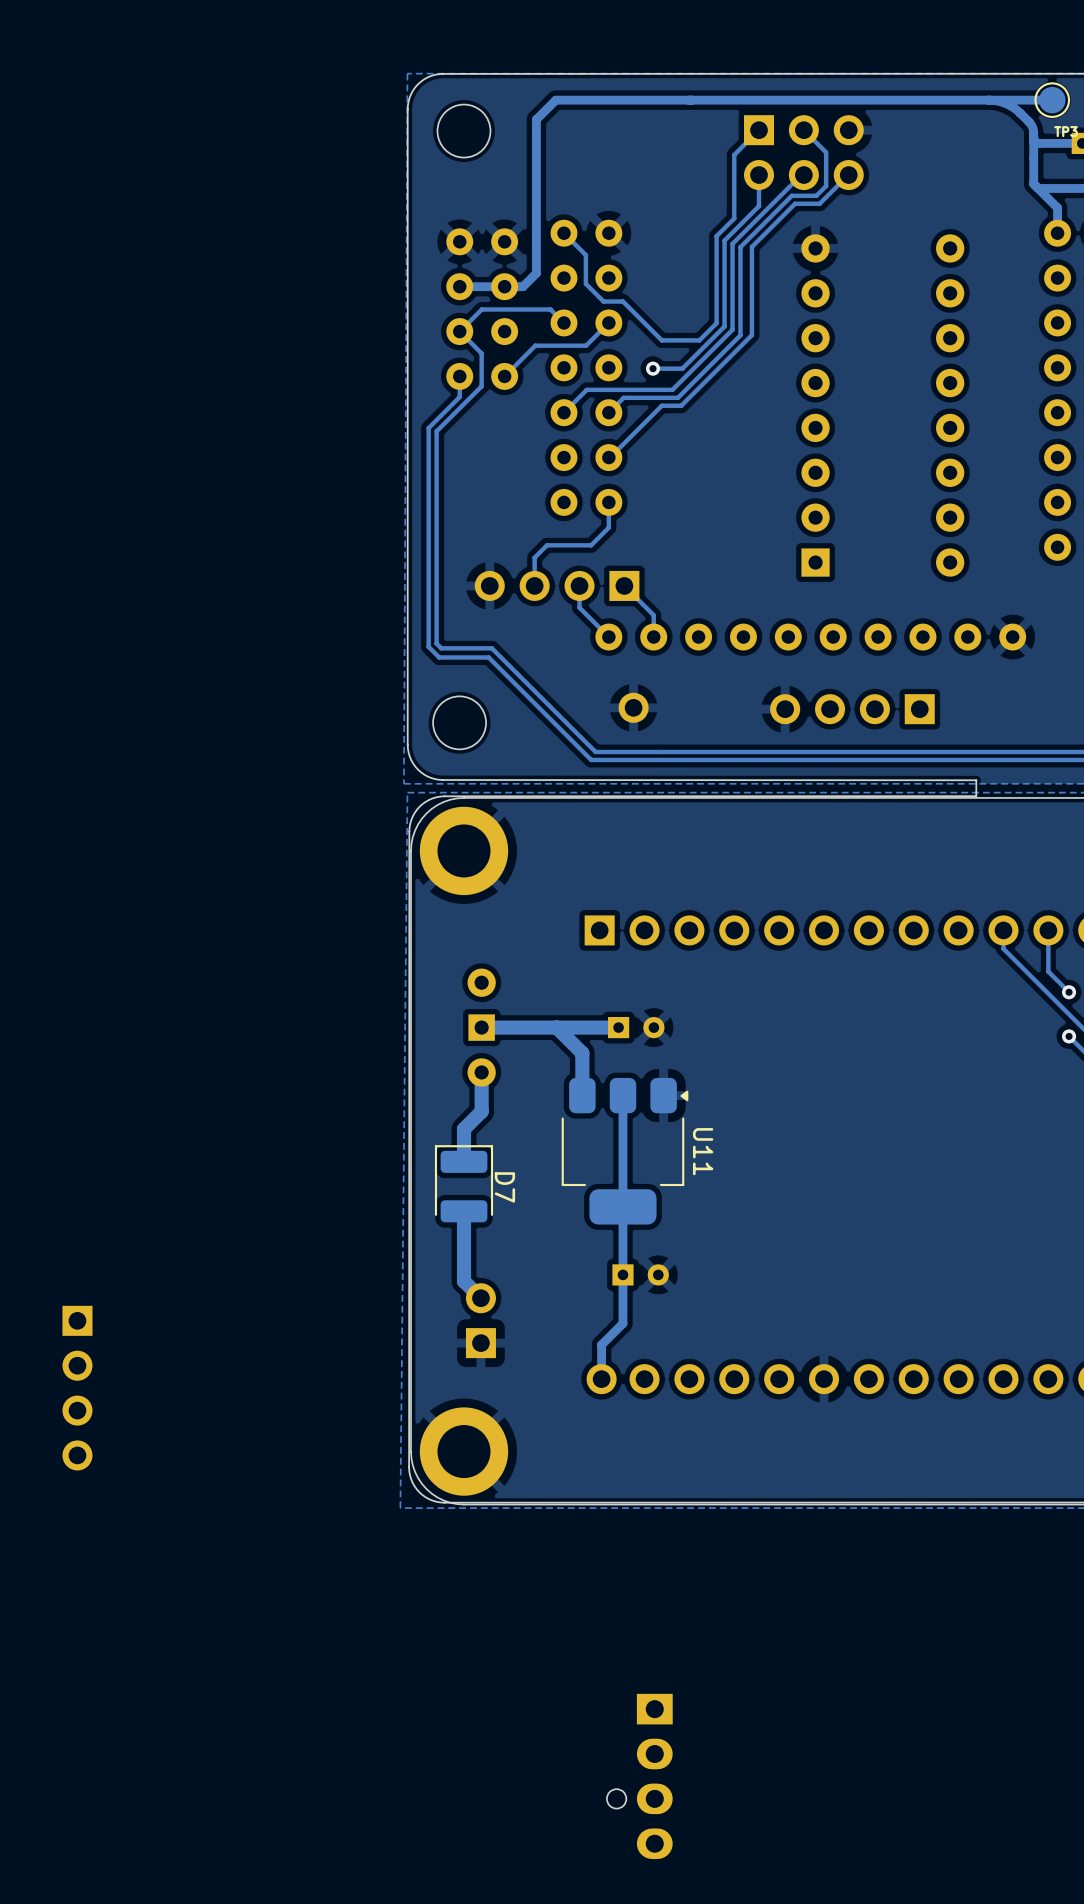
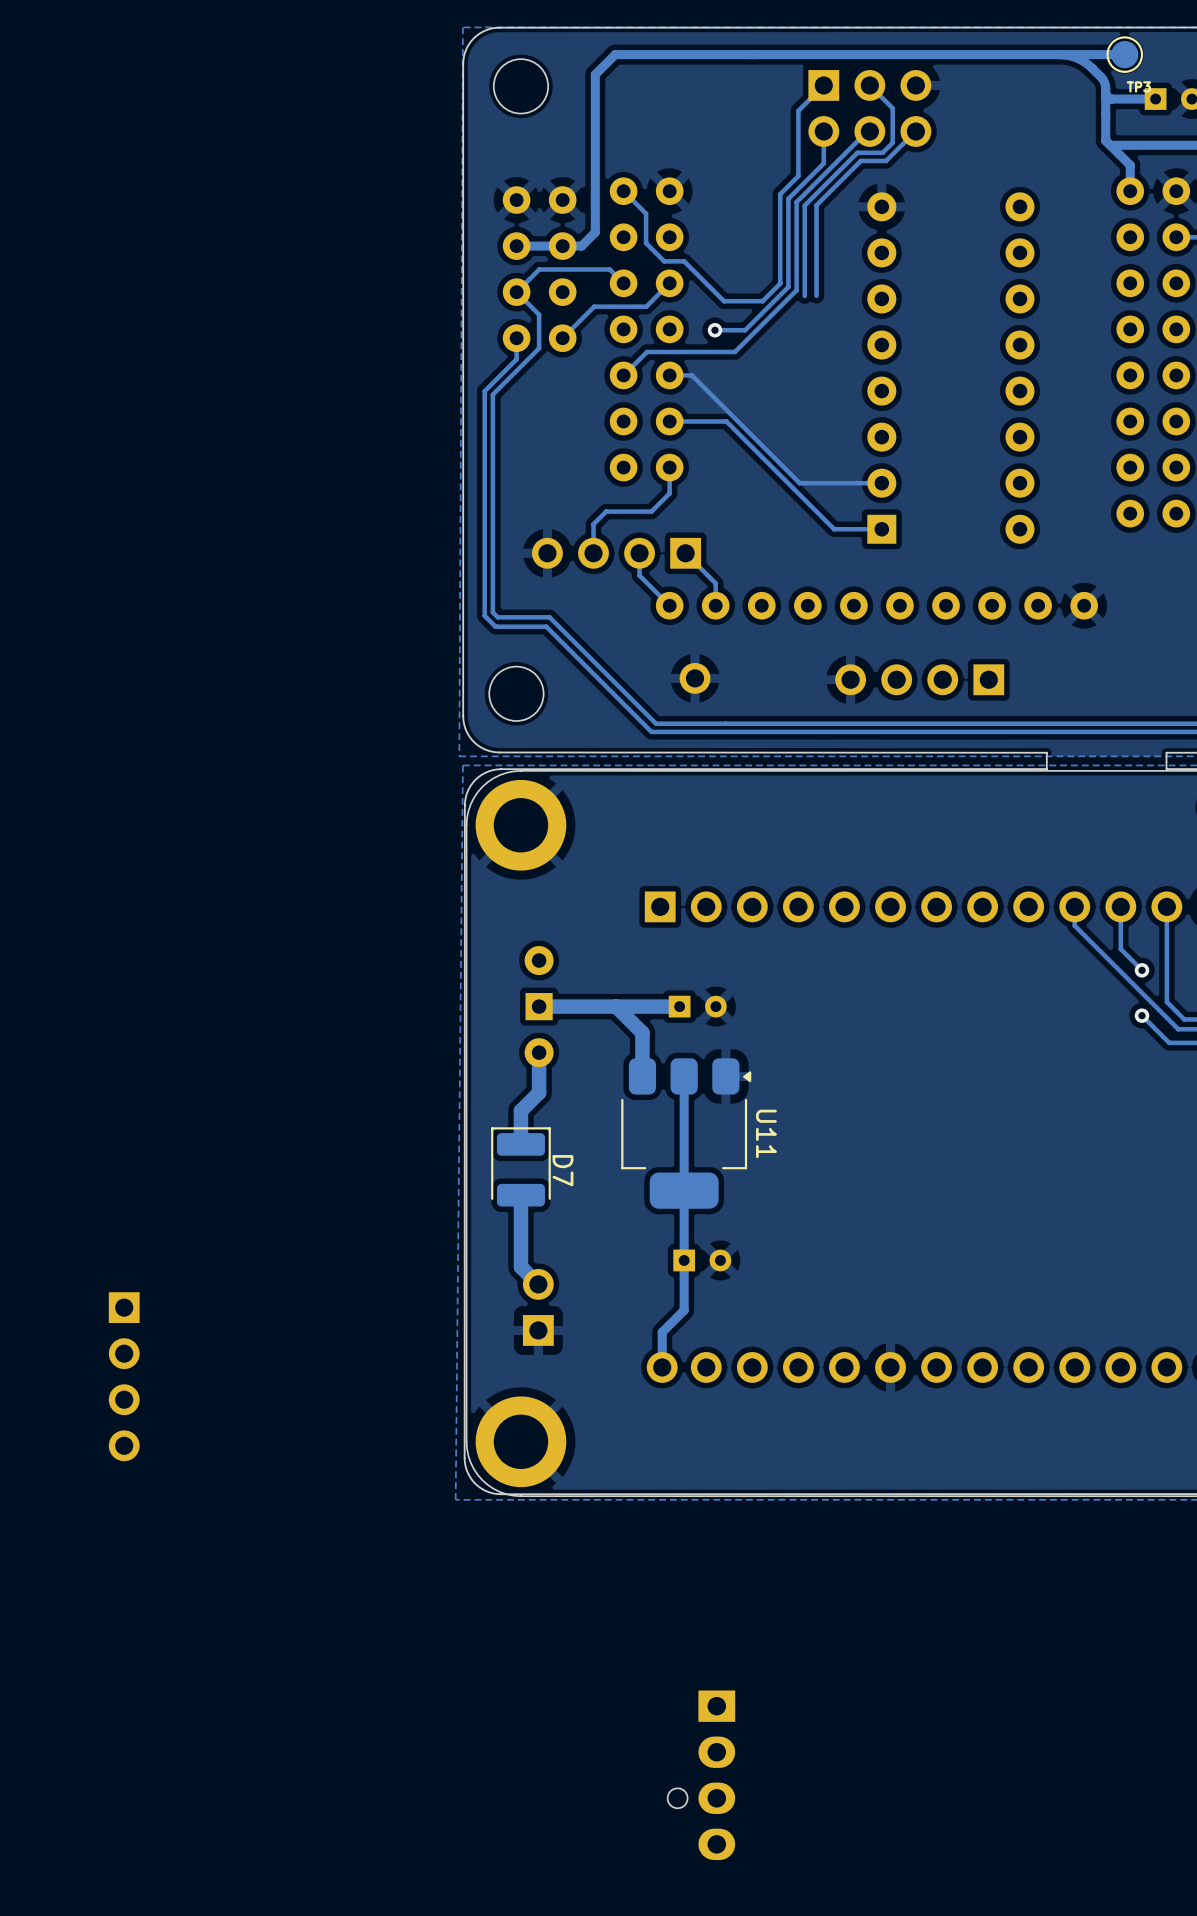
track: (740, 335) (677, 397) (623, 397) (608, 412) -> (881, 483) (799, 483) (691, 375) (669, 375)
track: (751, 335) (681, 405) (661, 405) (610, 457) -> (881, 529) (834, 529) (726, 421) (670, 421)

